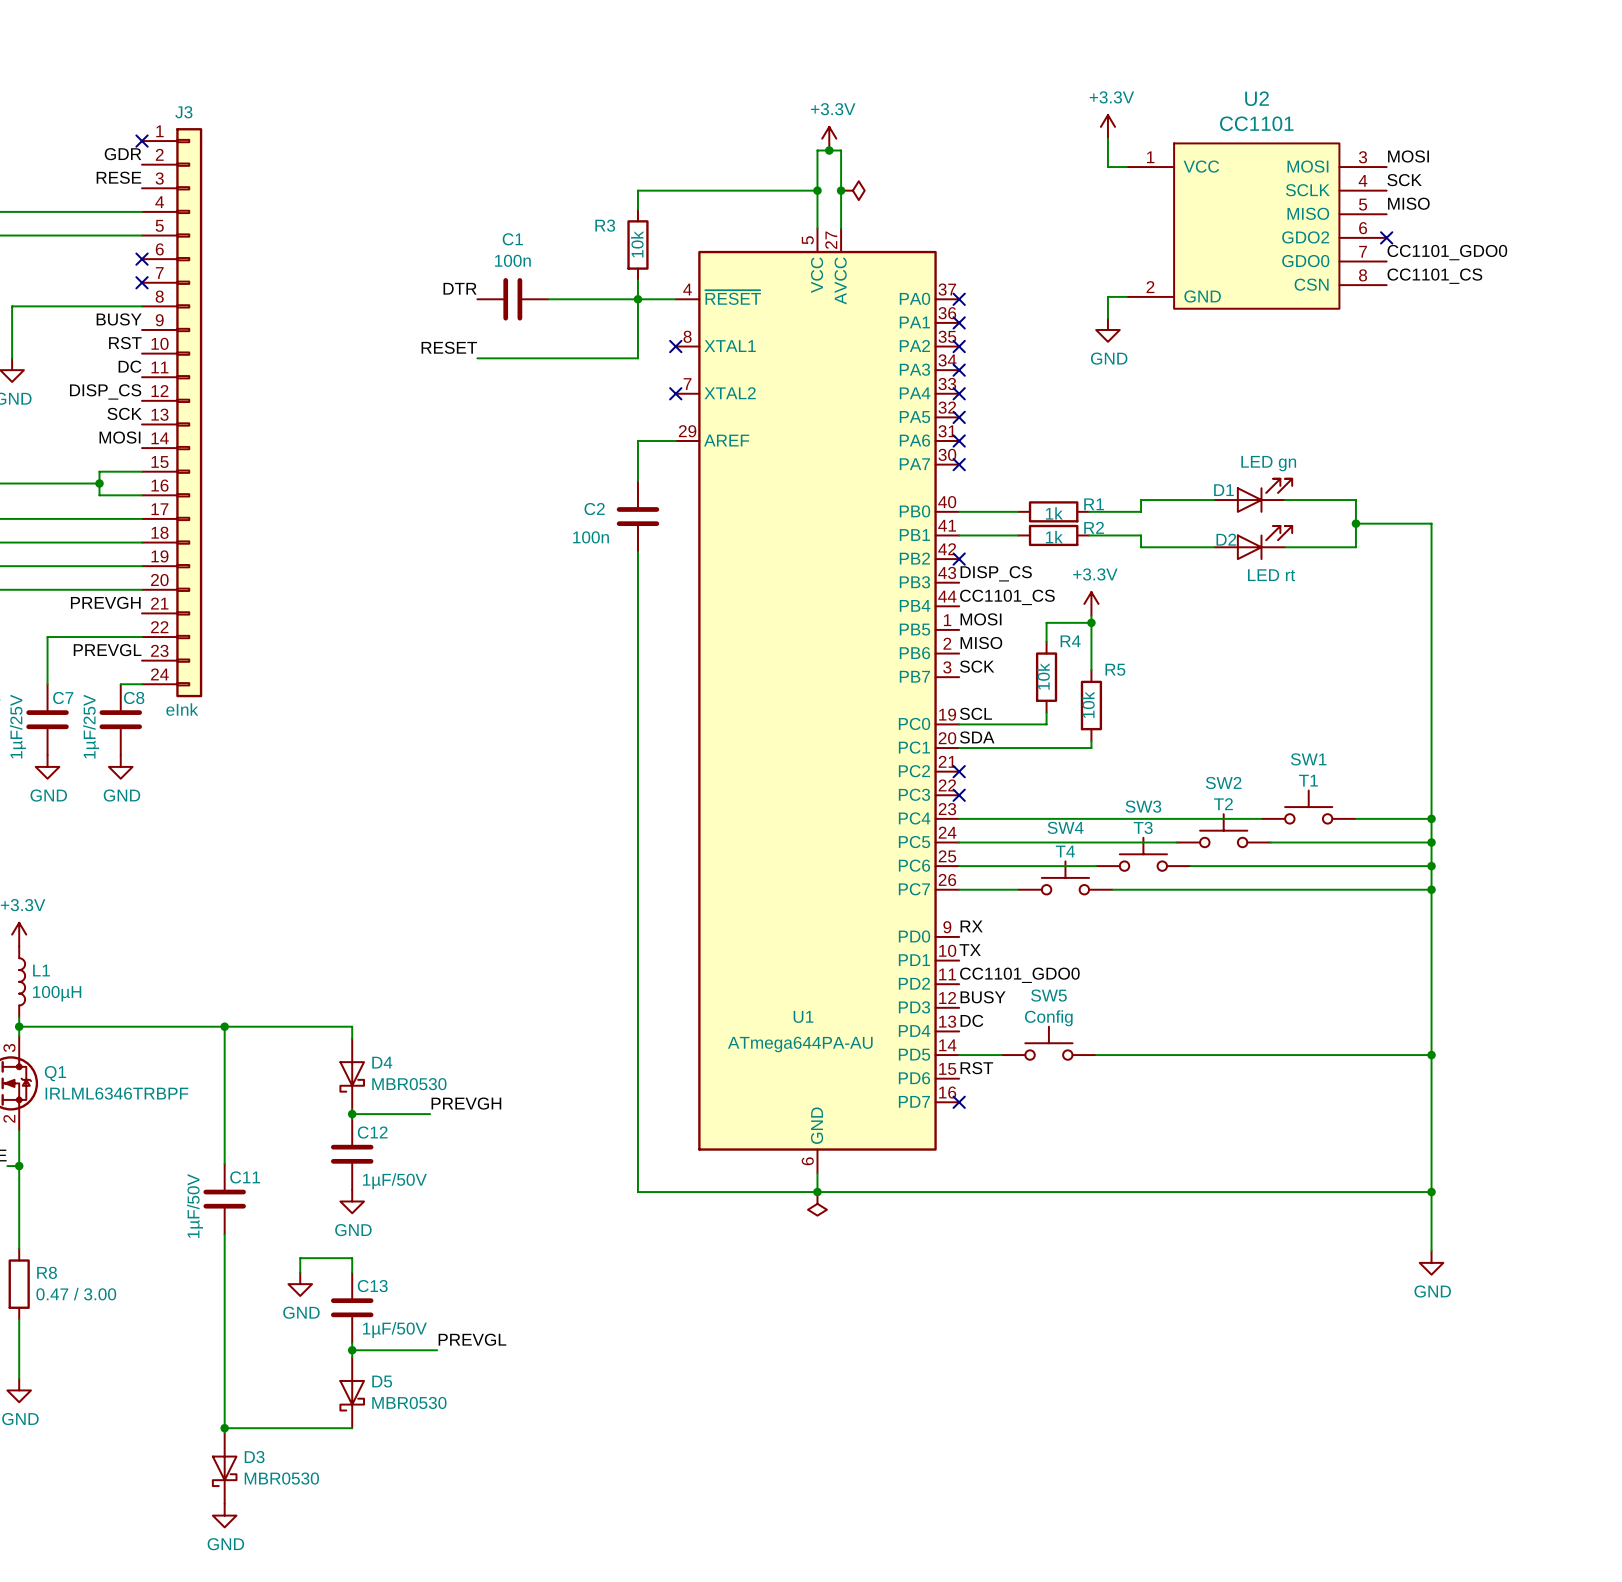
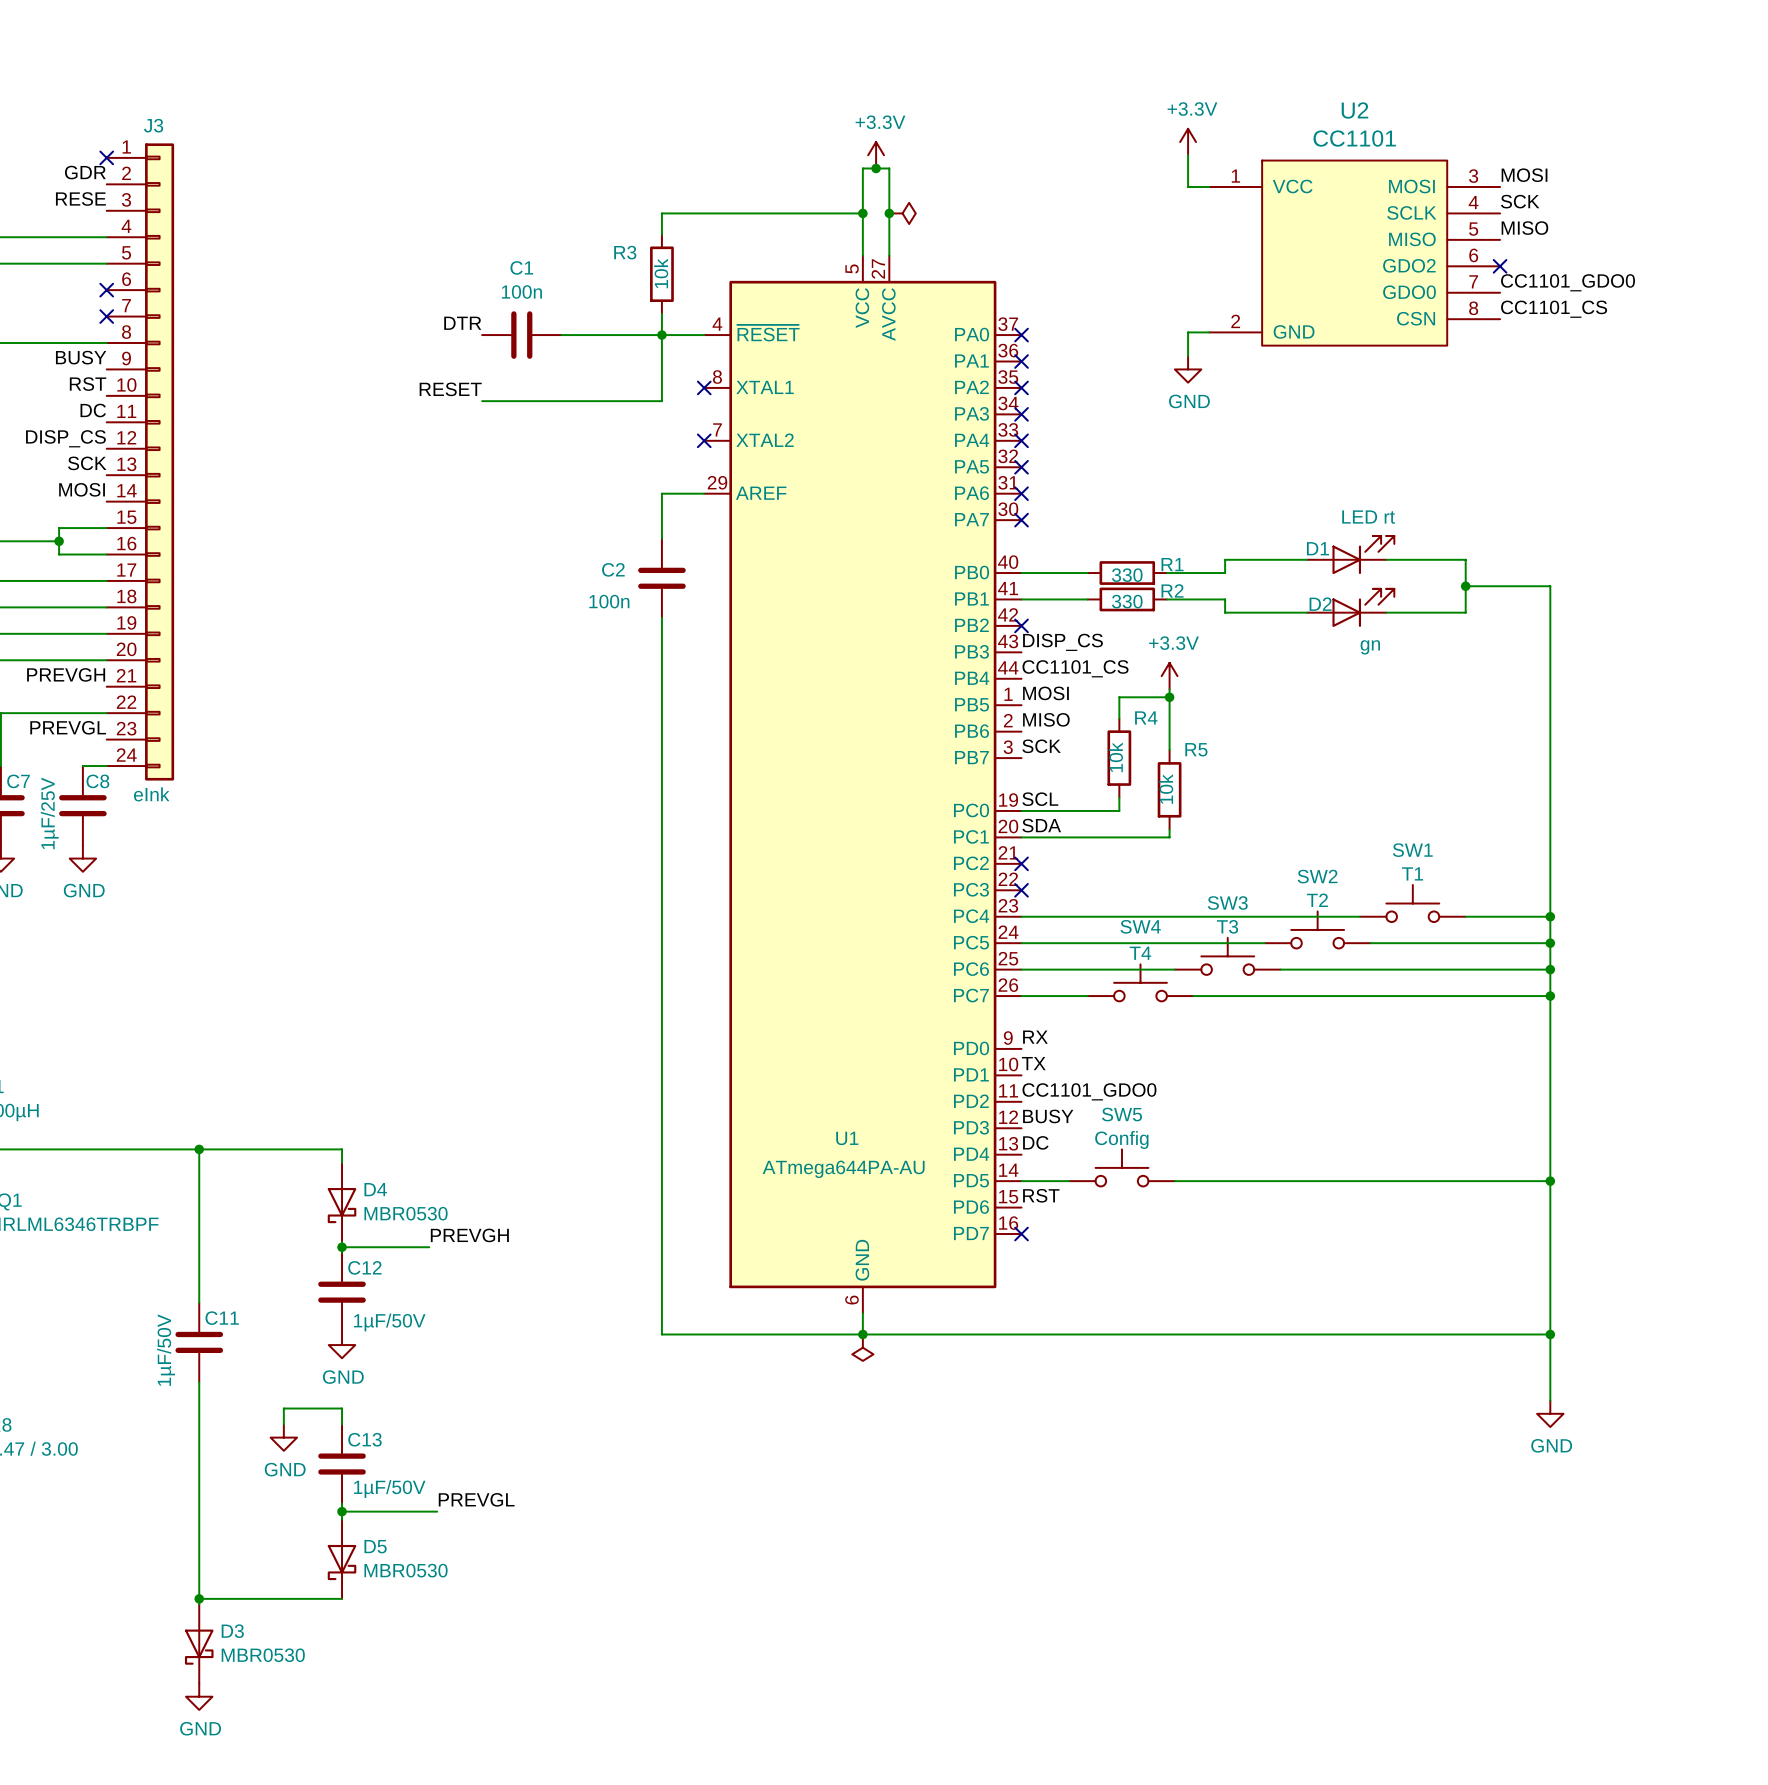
D1 value: LED gn (1268, 463) -> LED rt (1368, 517)
R1 value: 1k (1054, 513) -> 330 (1127, 575)
R2 value: 1k (1054, 537) -> 330 (1127, 601)
D2 value: LED rt (1271, 575) -> gn (1370, 647)

